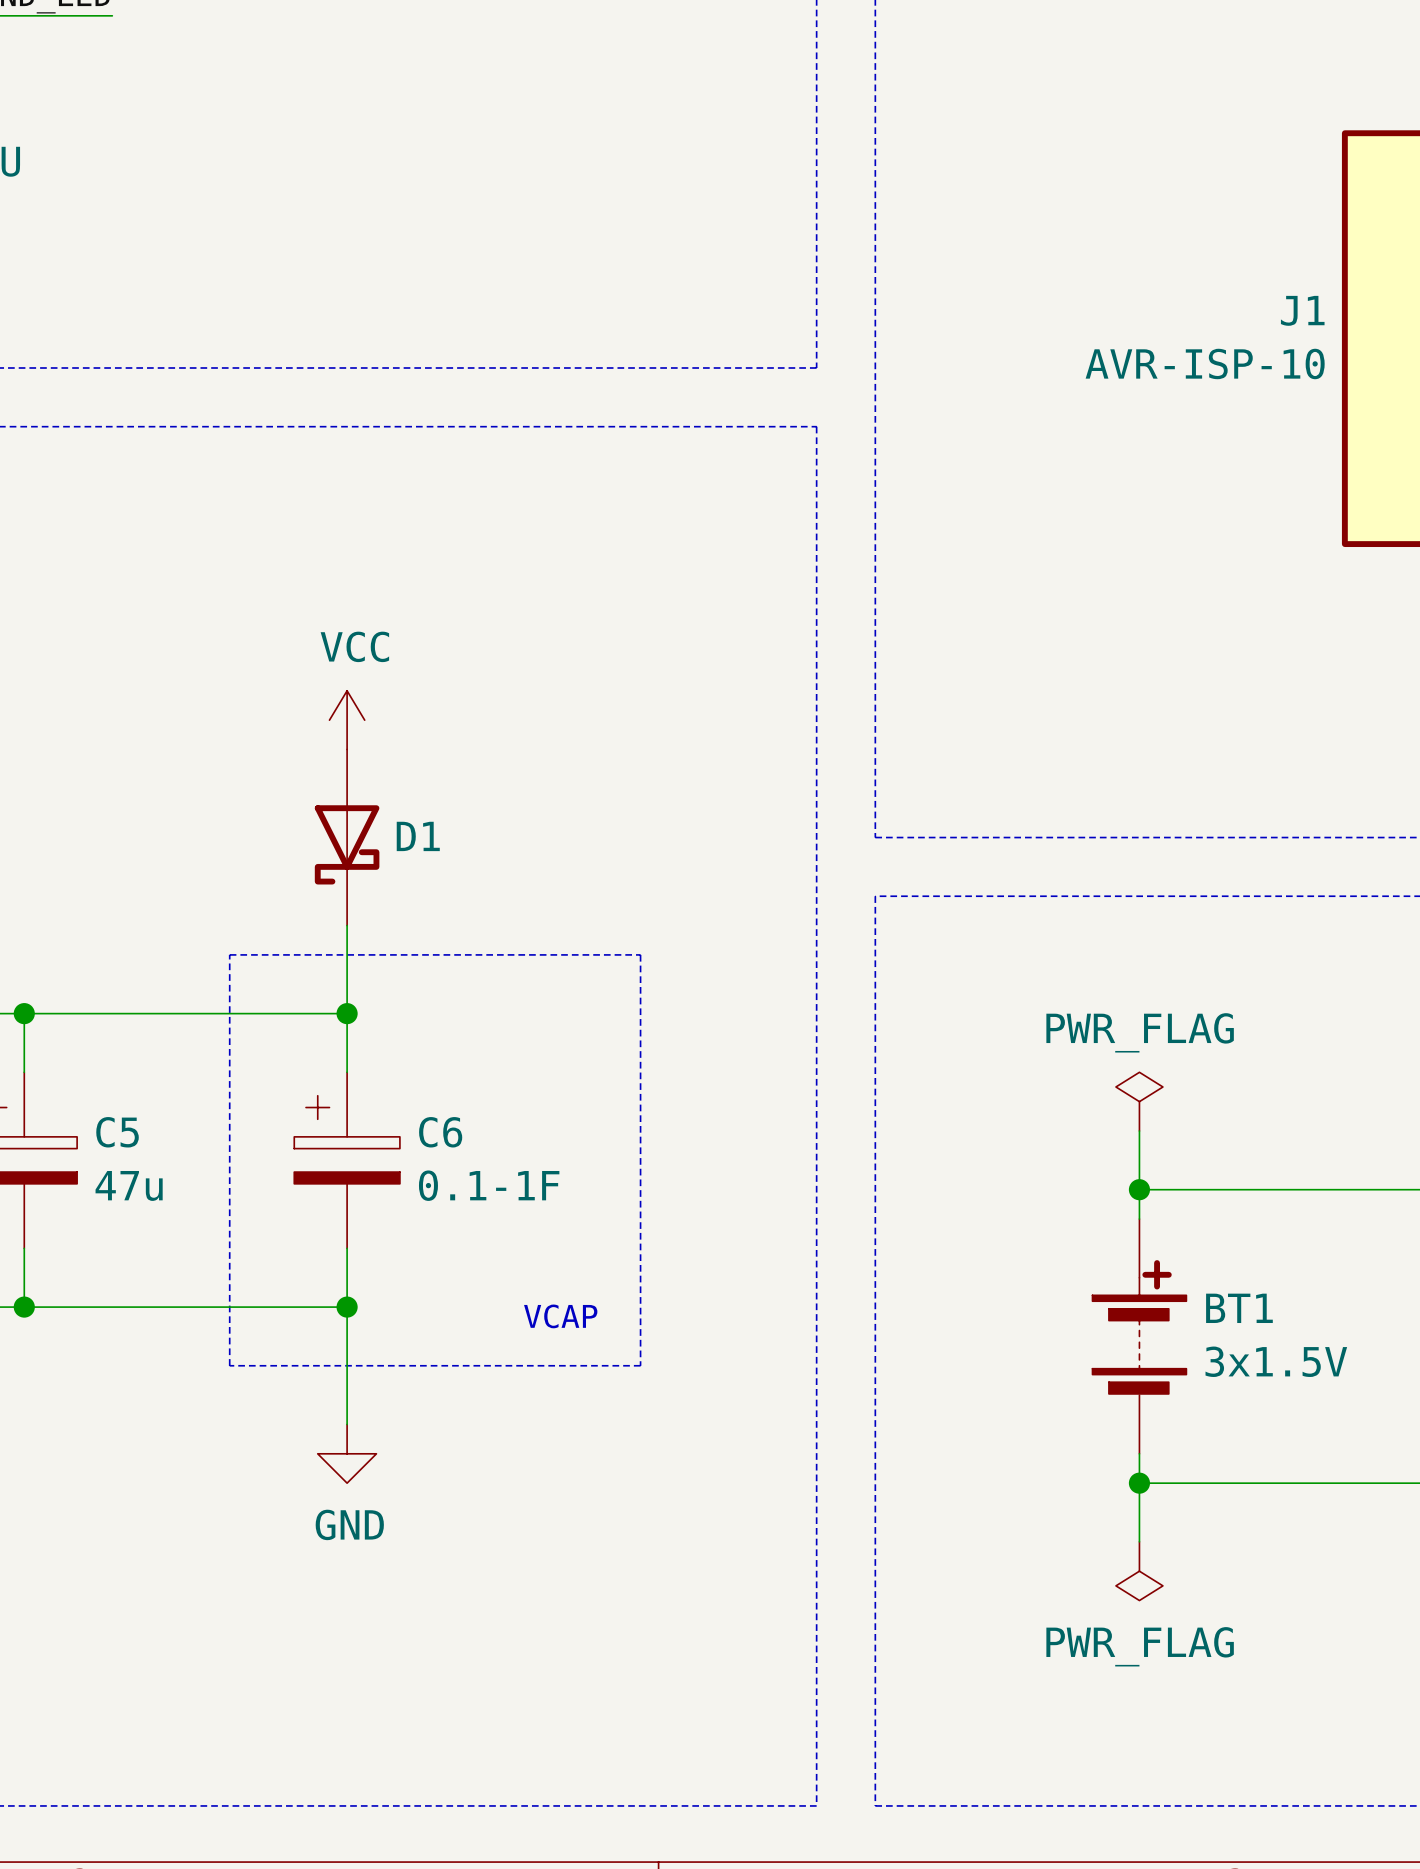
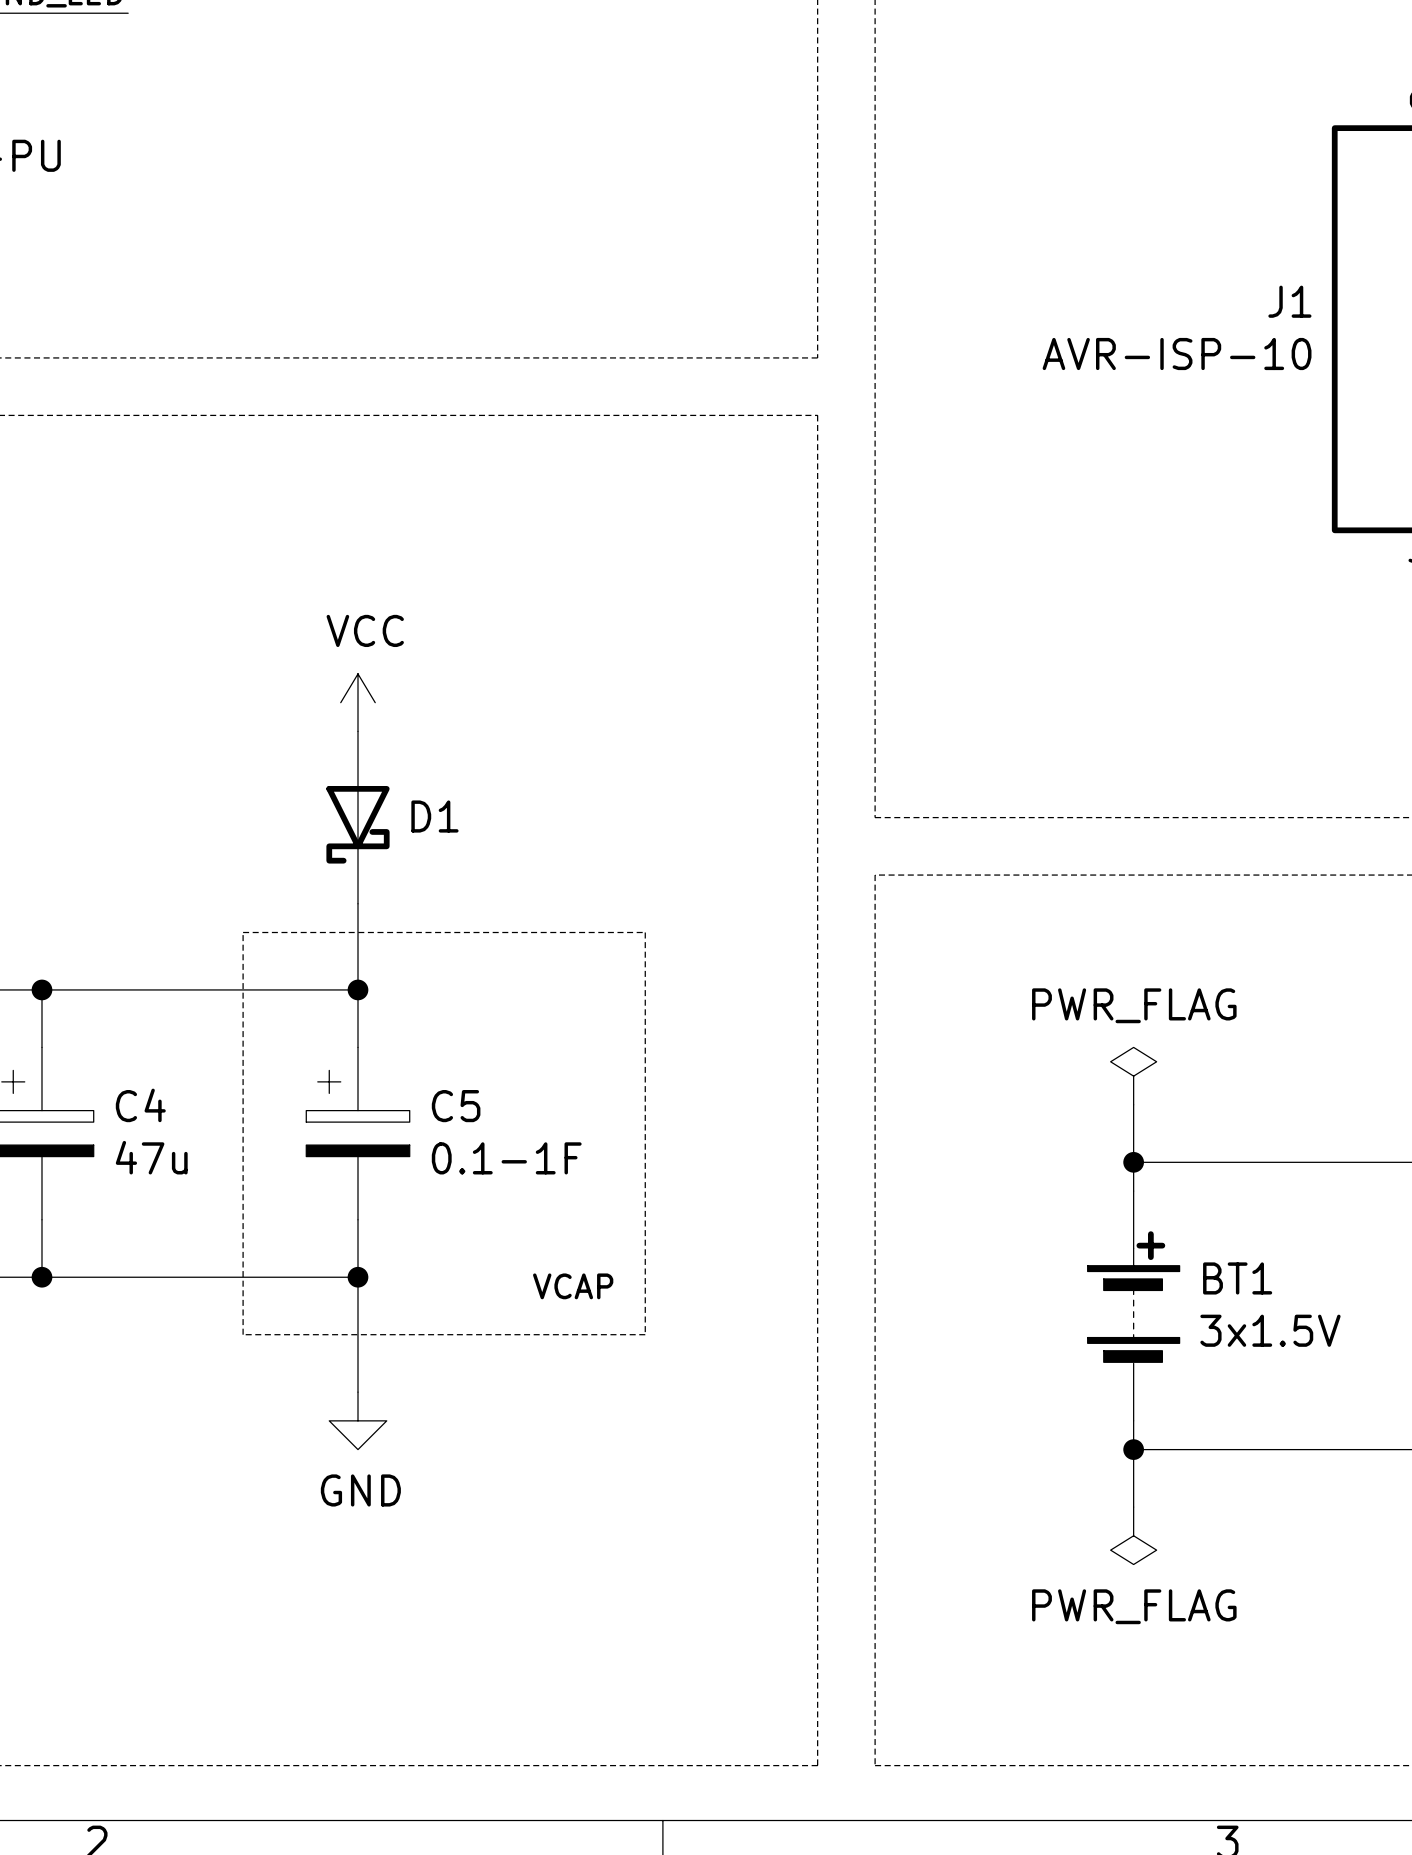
C5 name: C5 (117, 1132) -> C4 (140, 1105)
C6 name: C6 (440, 1132) -> C5 (456, 1106)

